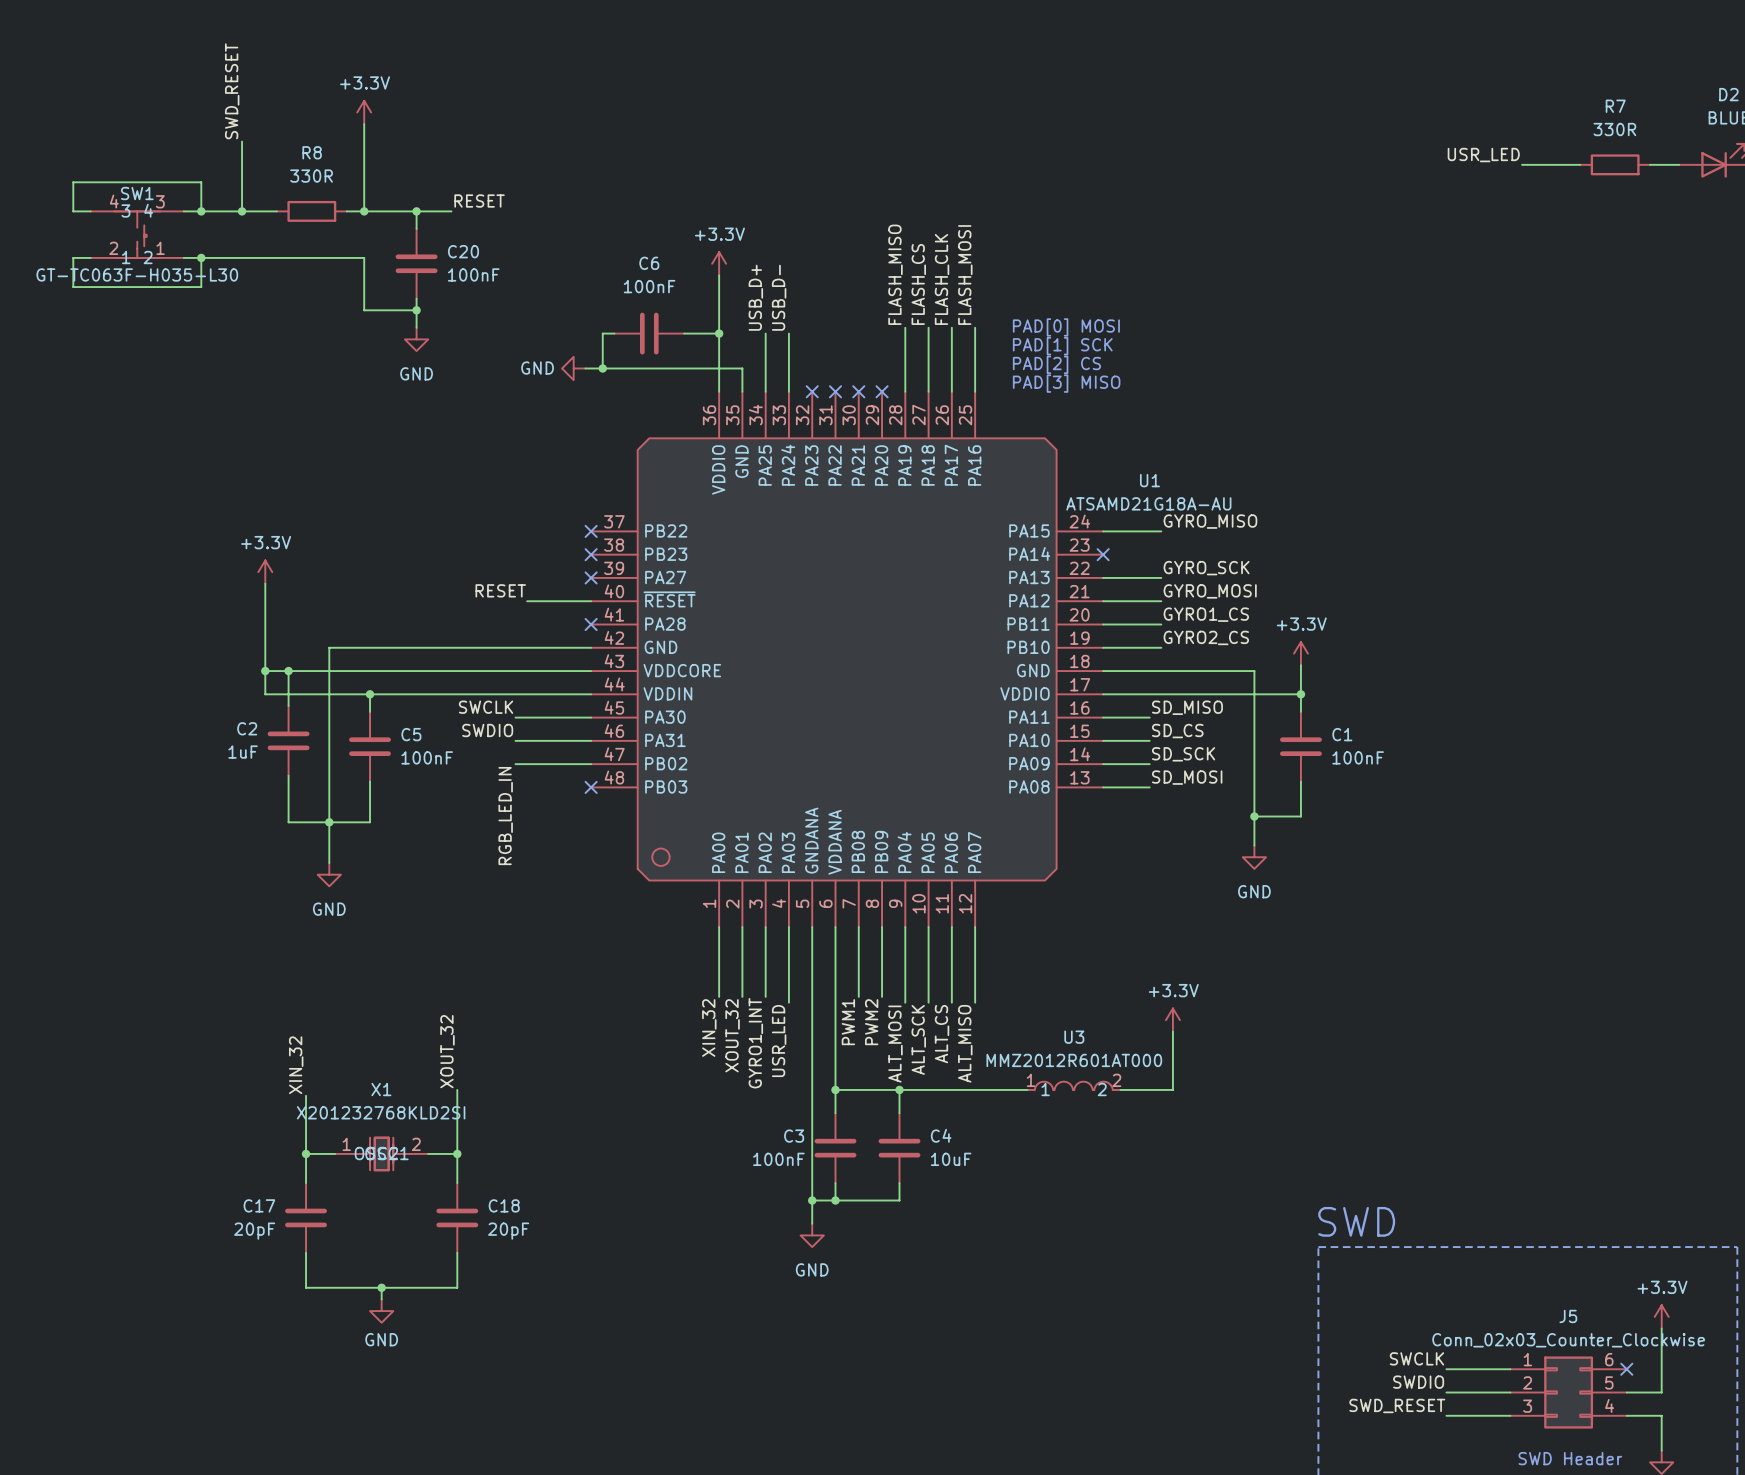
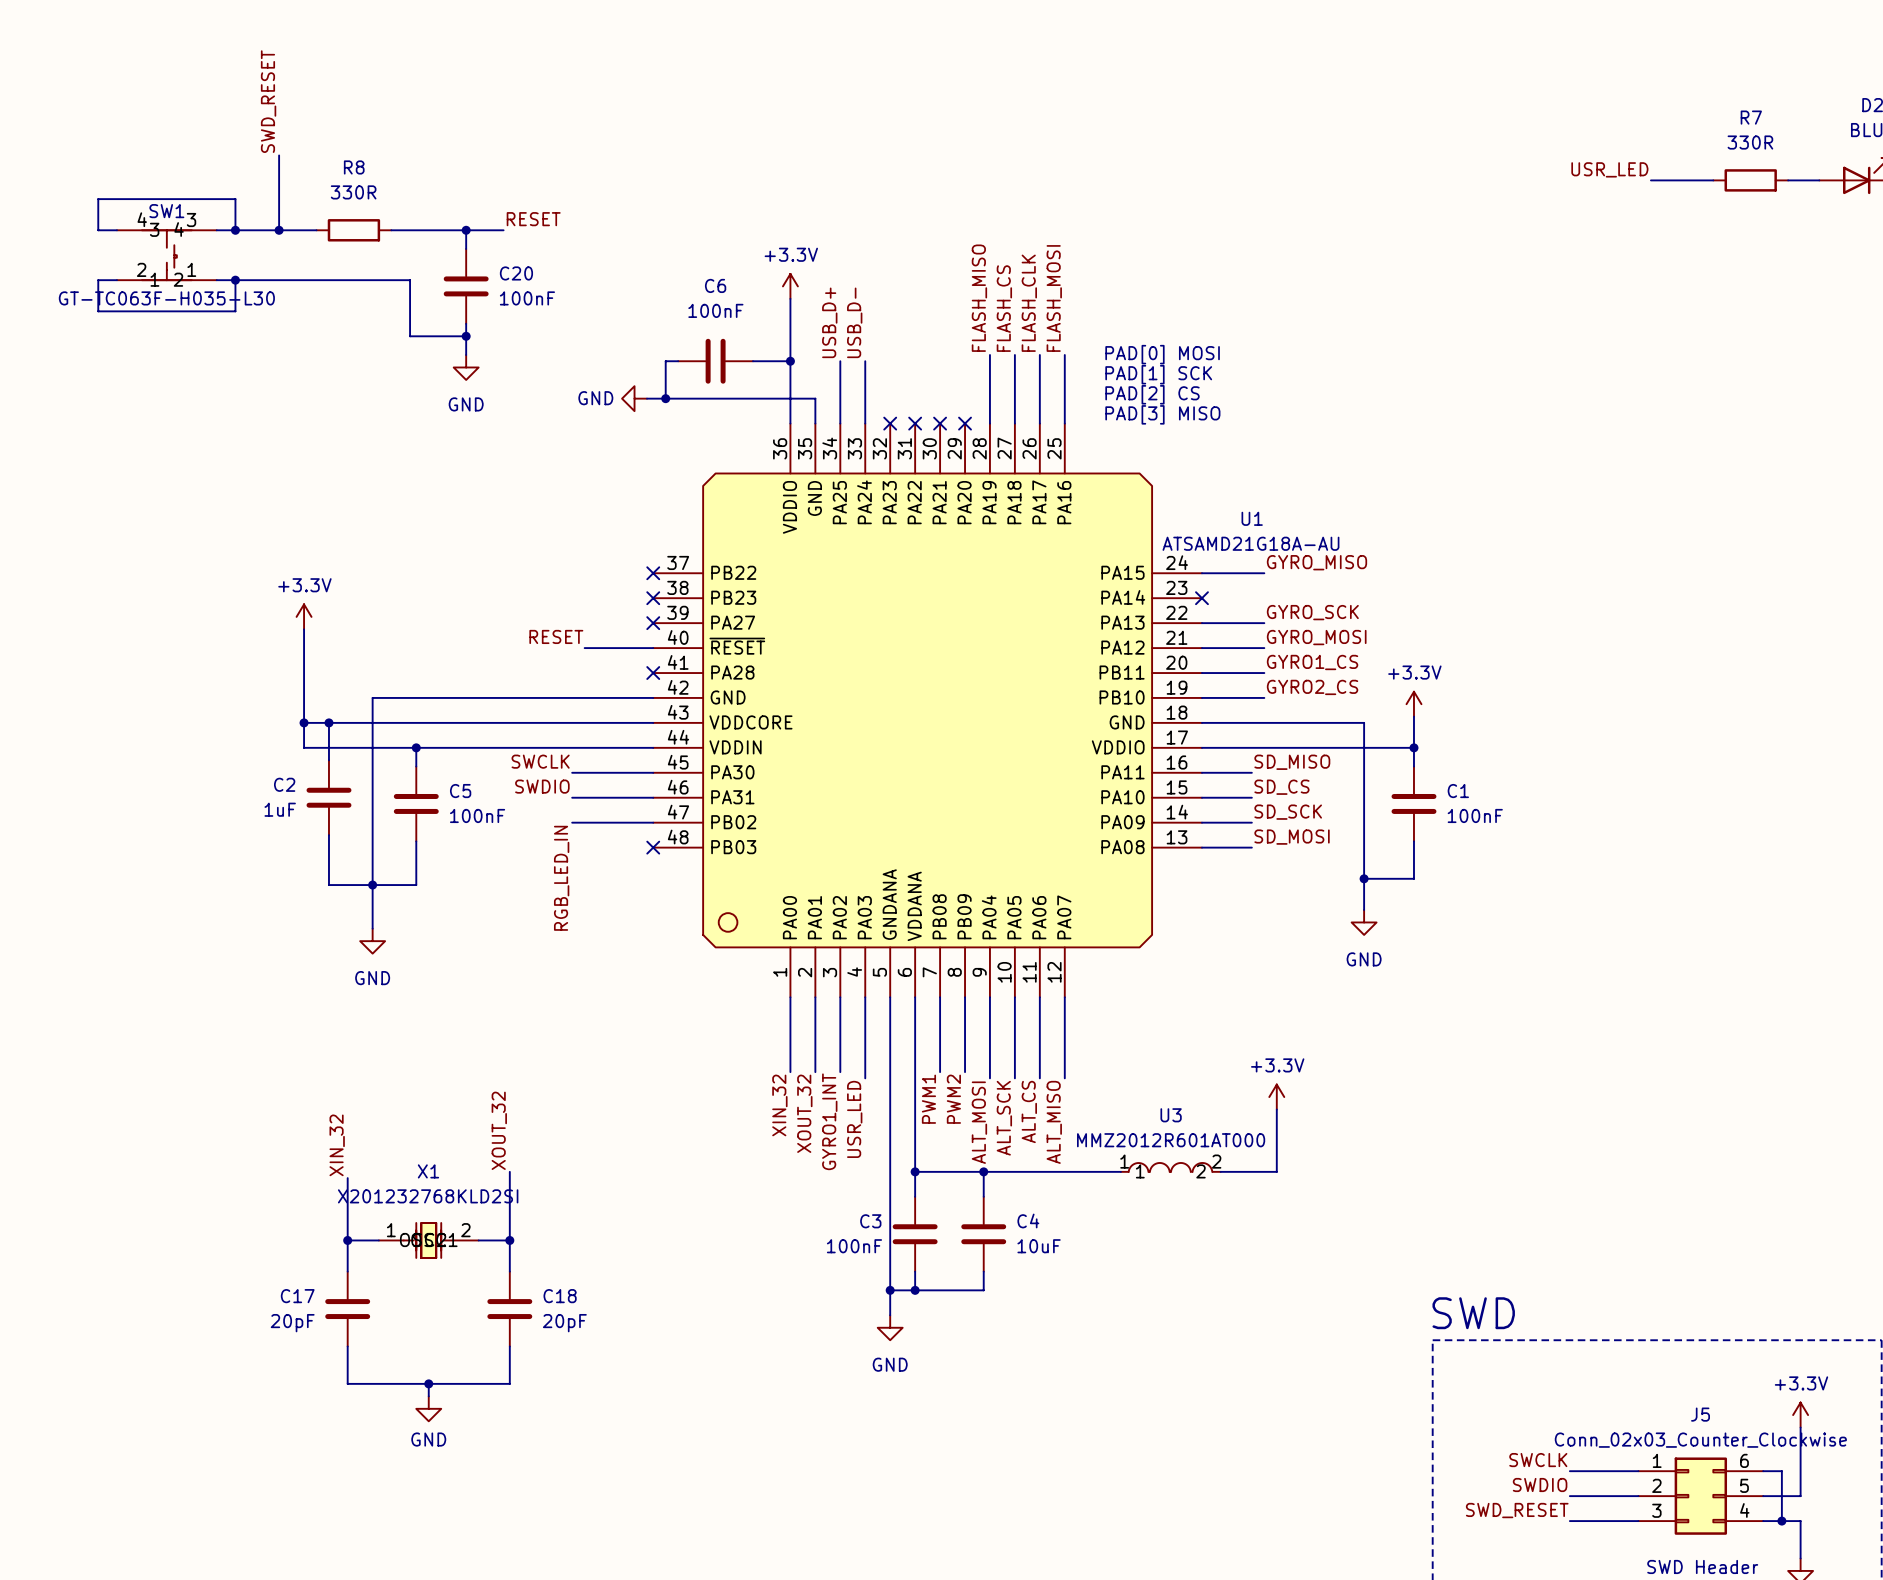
power symbol: +3.3V (364, 112) -> none
wire: (364, 124) (364, 211) -> none
junction: (364, 211) -> none
wire: none -> (1763, 1471) (1781, 1471) (1781, 1521)
no-connect mark: (1626, 1369) -> none
junction: none -> (1781, 1521)

